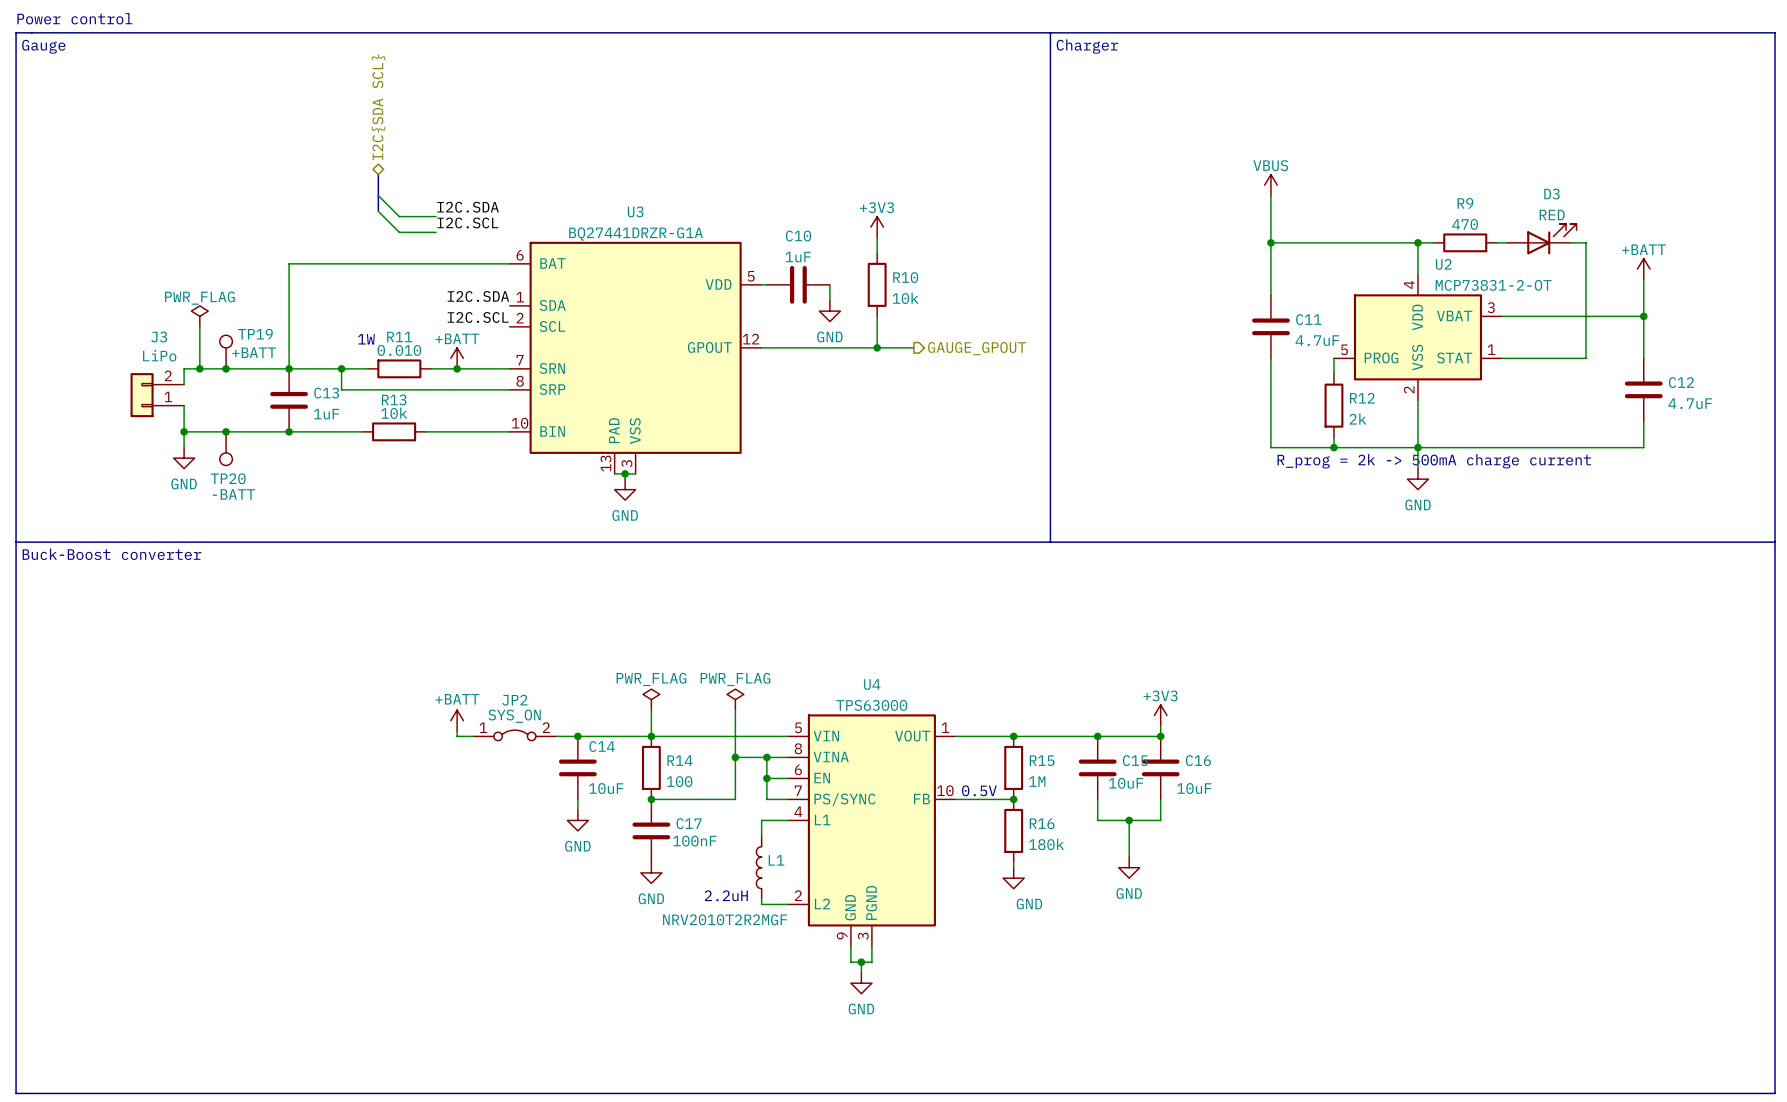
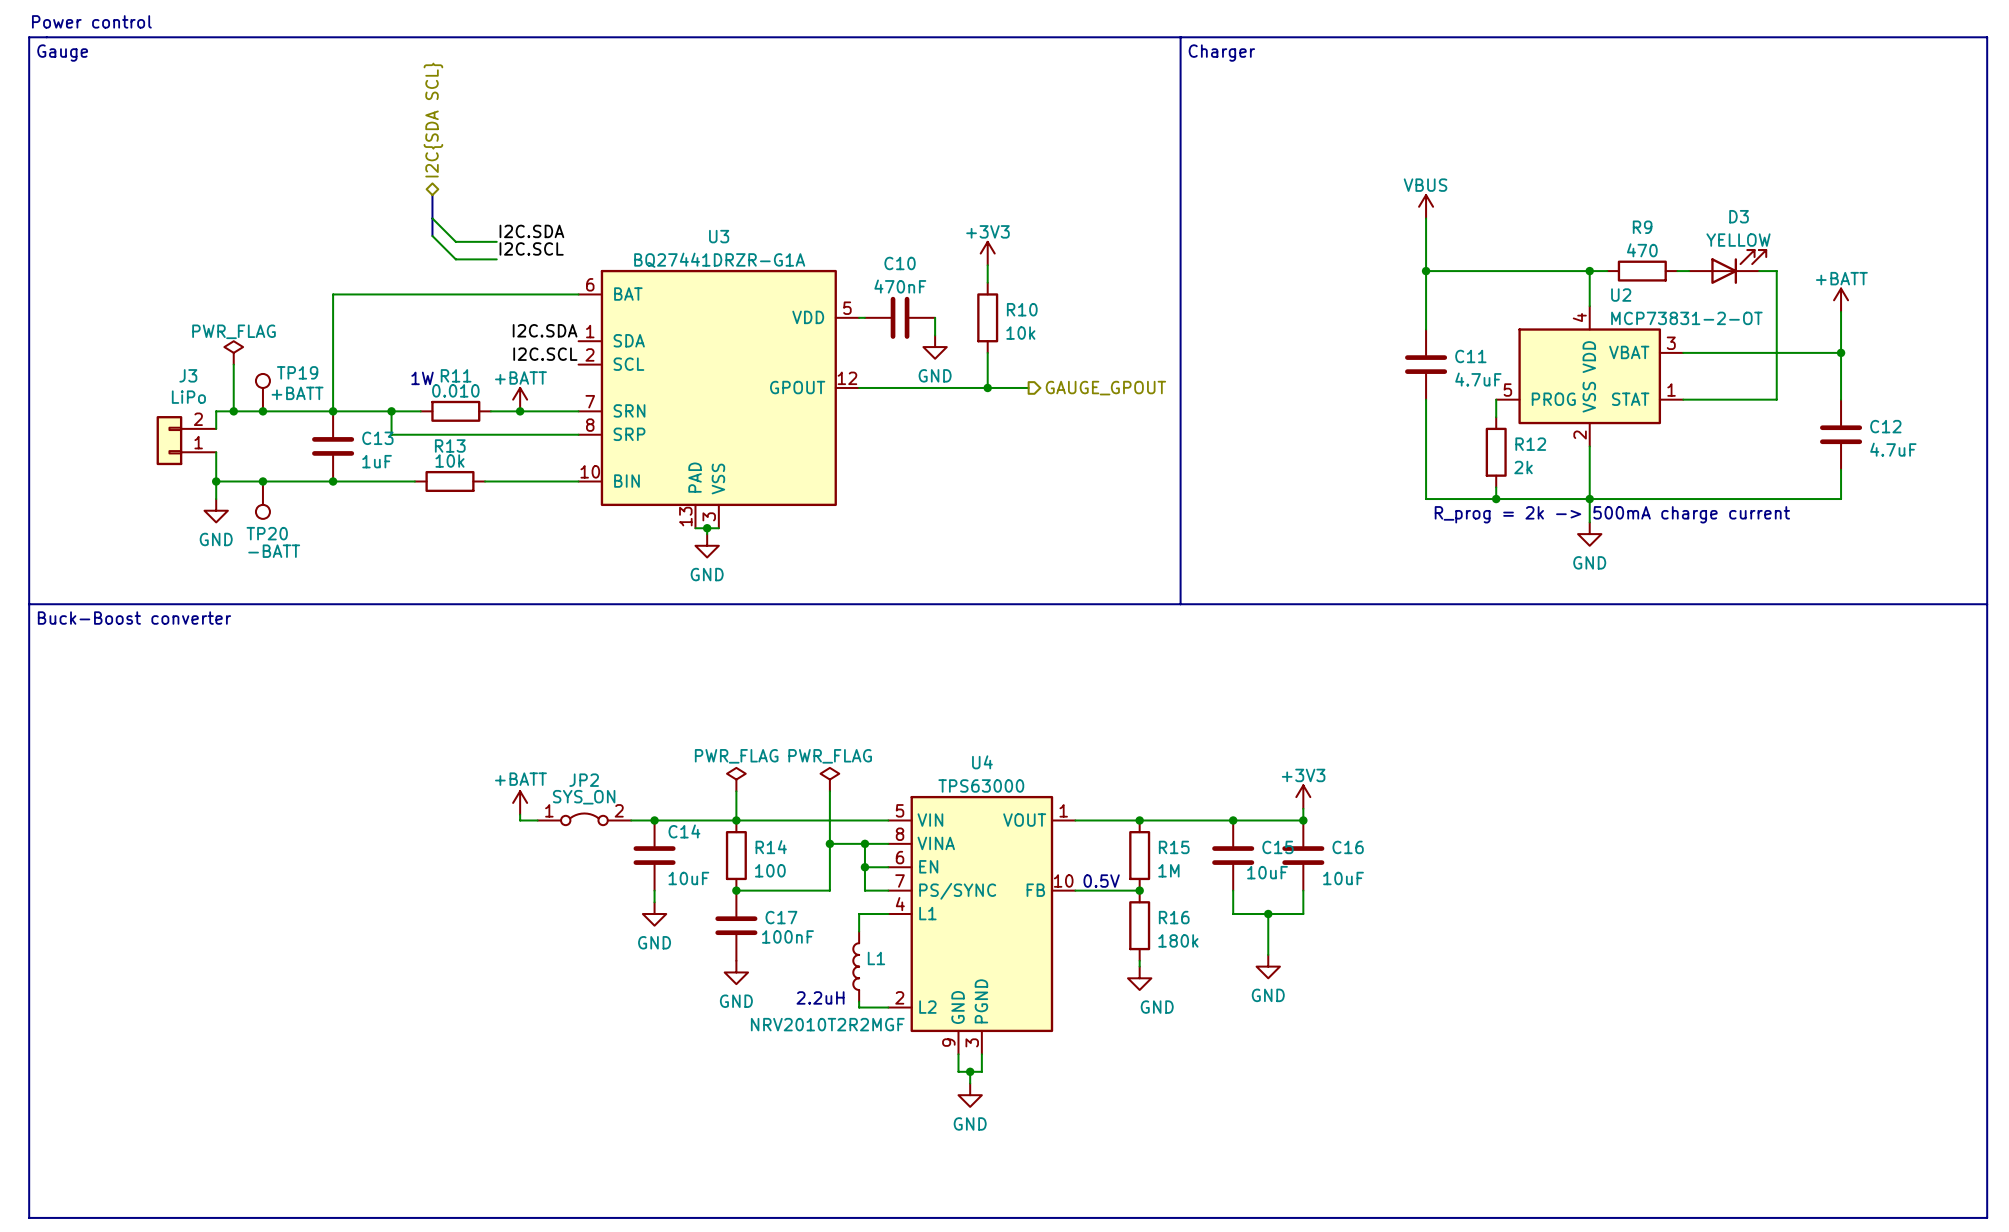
D3 value: RED (1552, 214) -> YELLOW (1738, 240)
C10 value: 1uF (798, 257) -> 470nF (900, 286)

